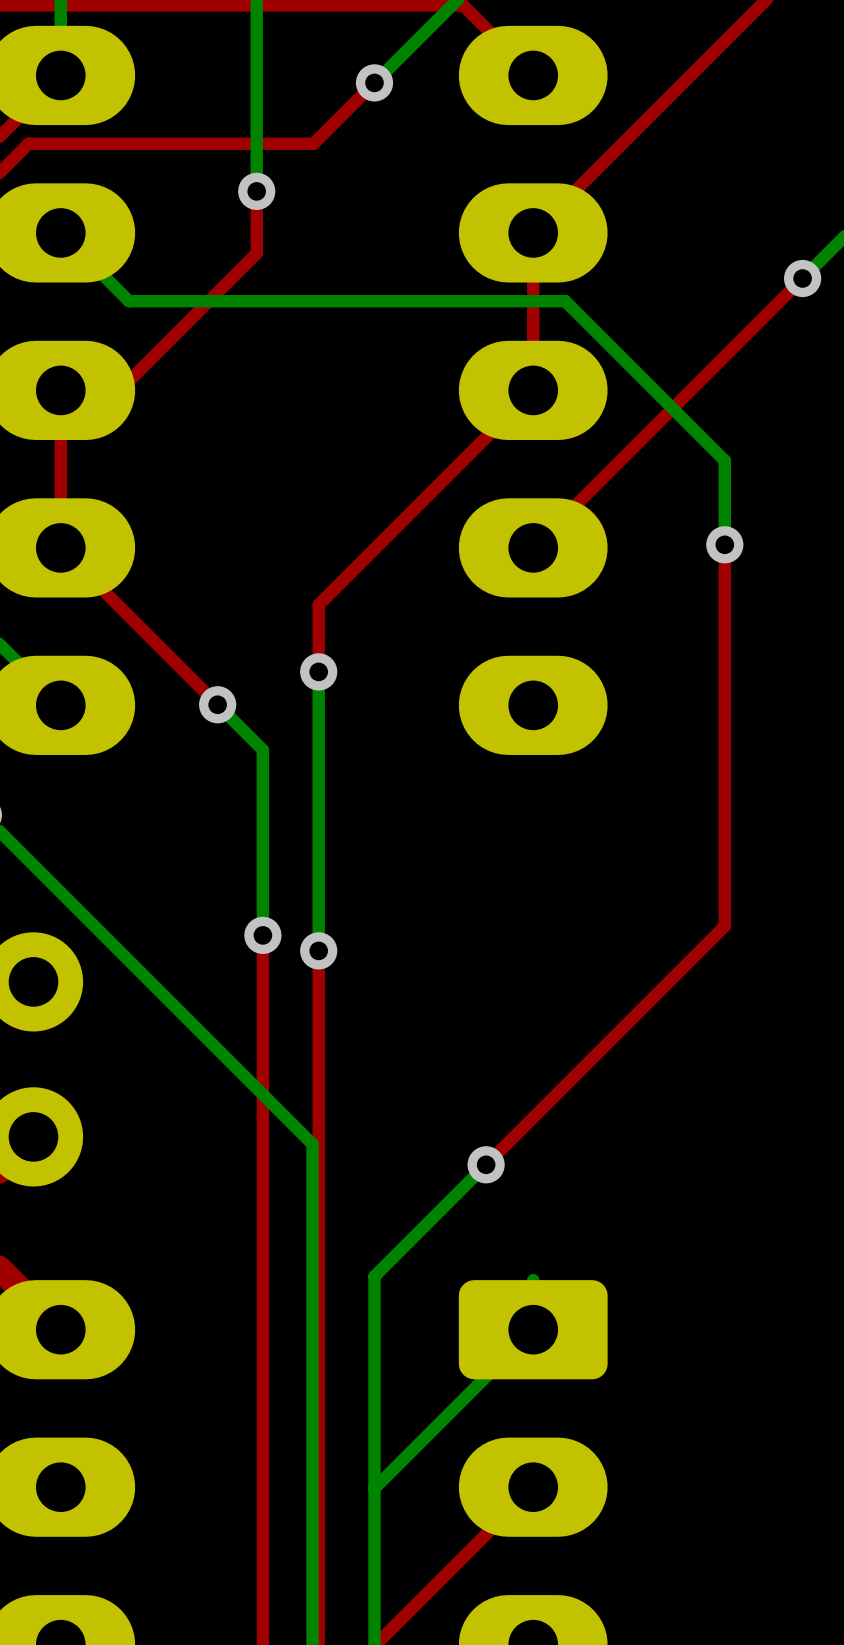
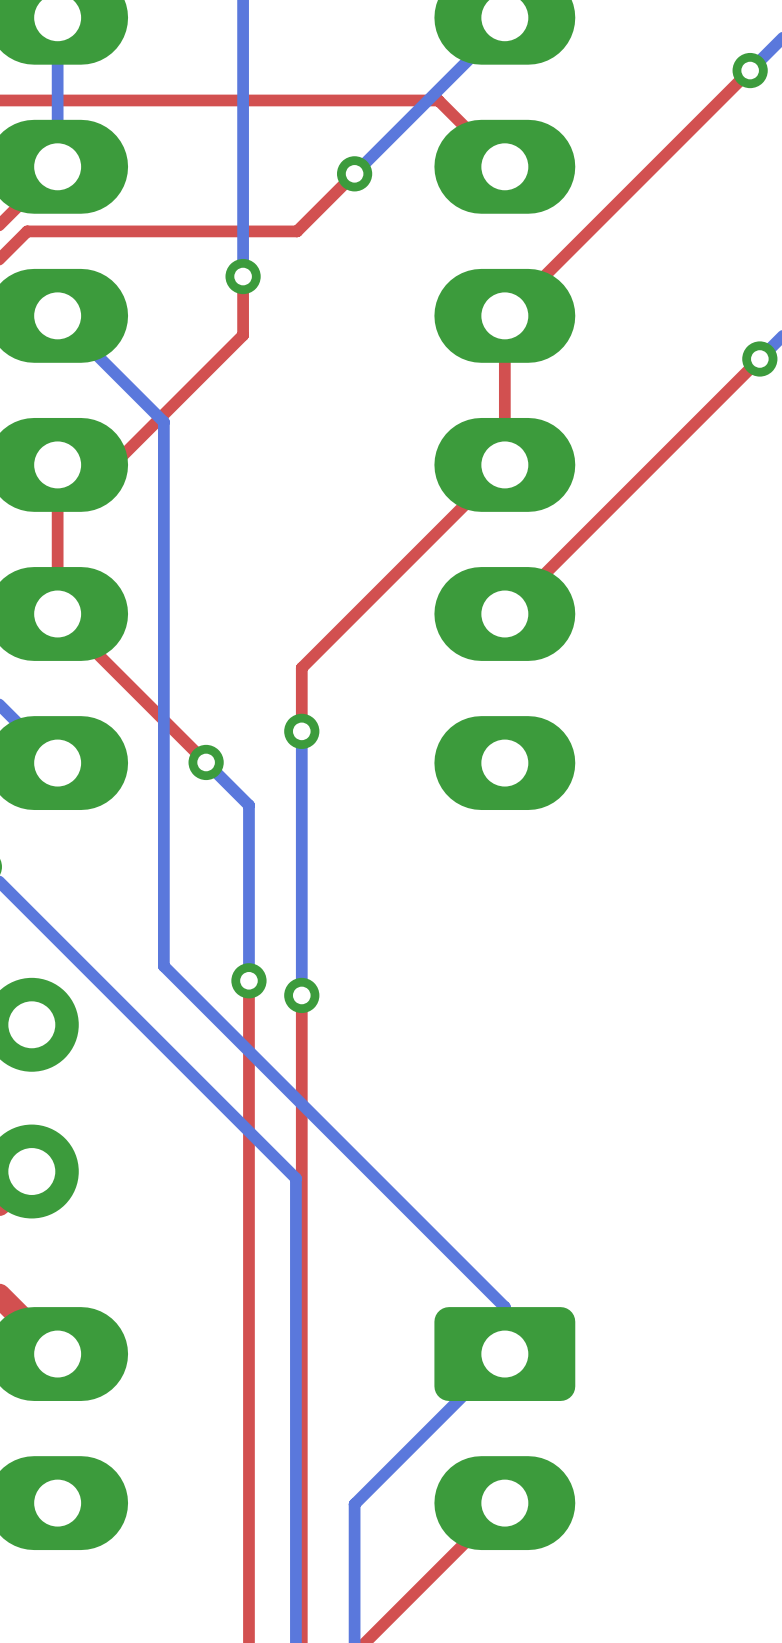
bottom track: (129, 301) (565, 301) (724, 460) (724, 544) -> (122, 380) (163, 422) (163, 966) (504, 1307)
top track: (724, 544) (724, 926) (486, 1164) -> none
via: (724, 544) -> none
bottom track: (486, 1164) (374, 1276) (374, 1488) -> none
via: (486, 1164) -> none

